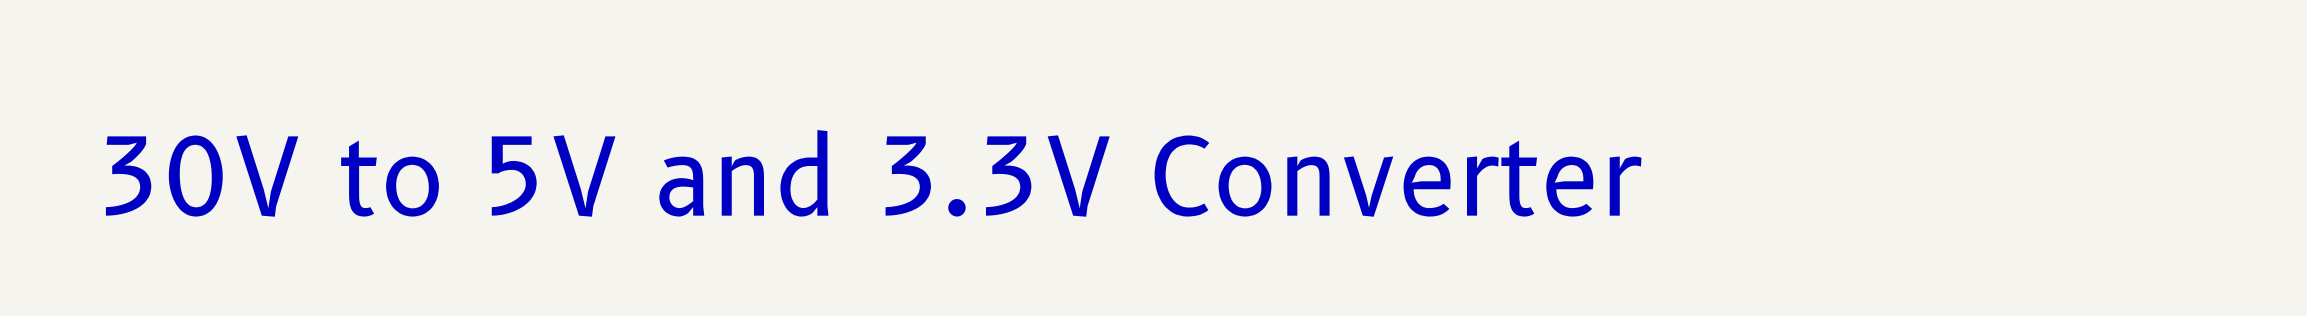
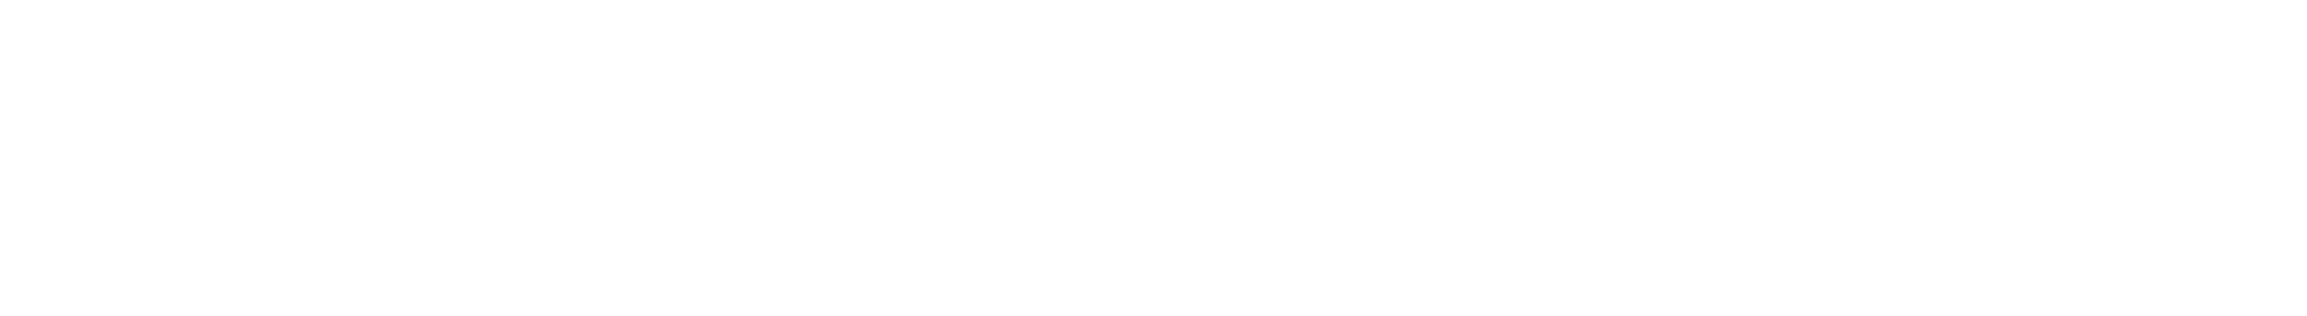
text: 30V to 5V and 3.3V Converter (873, 173) -> none

